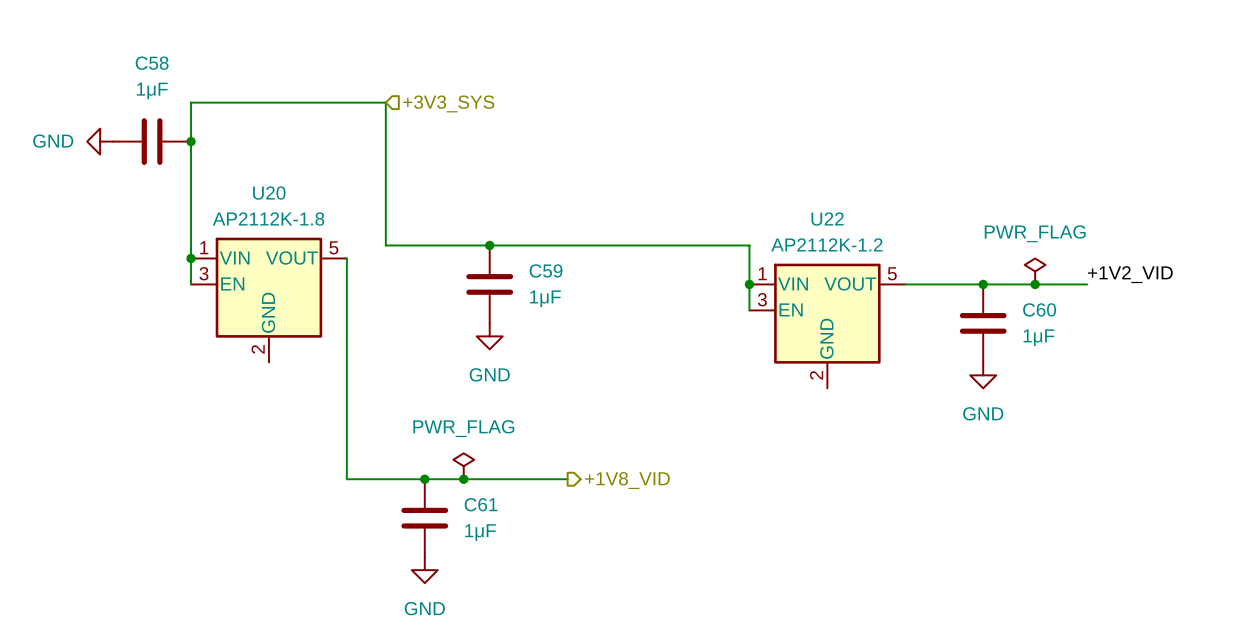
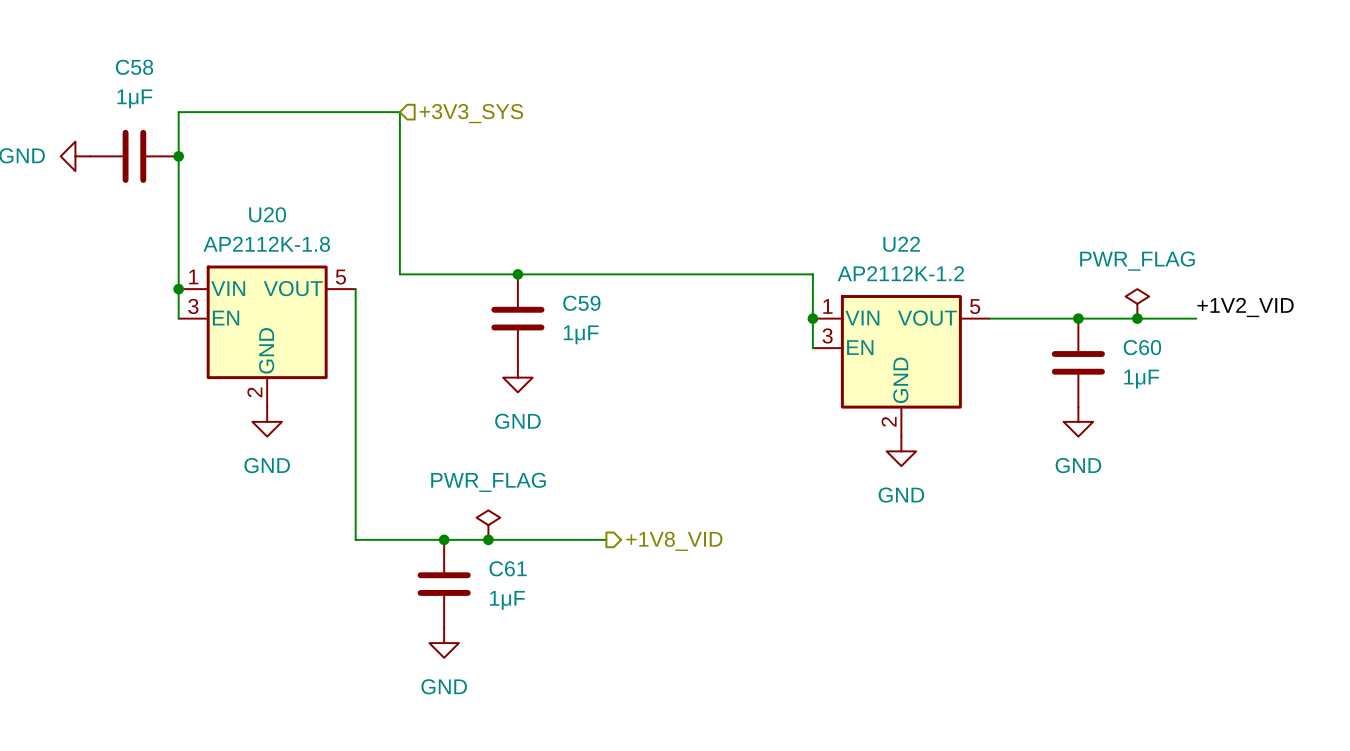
power symbol: none -> GND (267, 421)
power symbol: none -> GND (901, 451)

